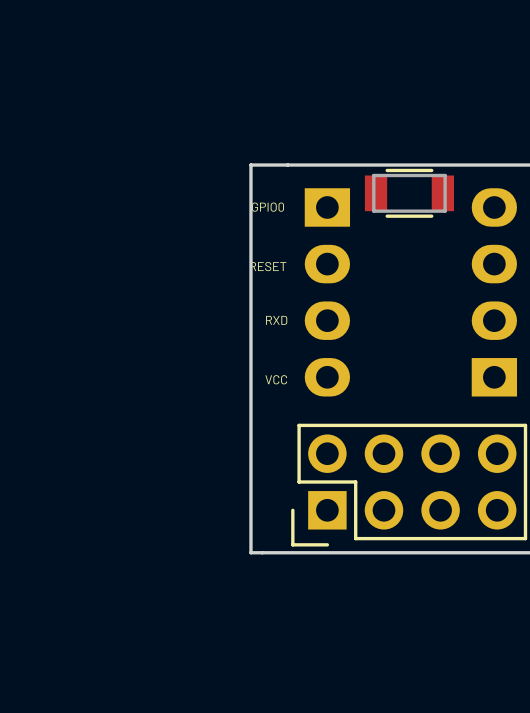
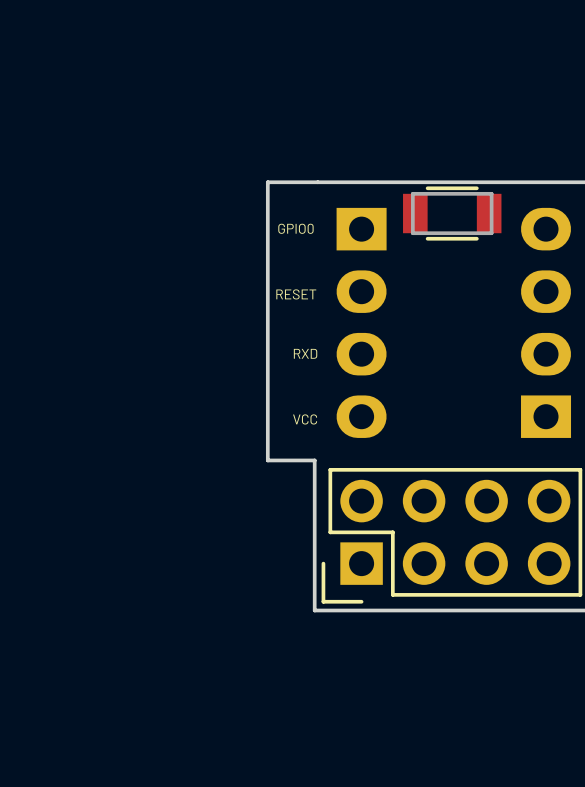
board edge: (250, 165) (250, 552) (284, 552) -> (277, 182) (267, 182) (267, 460) (314, 460) (314, 610)

